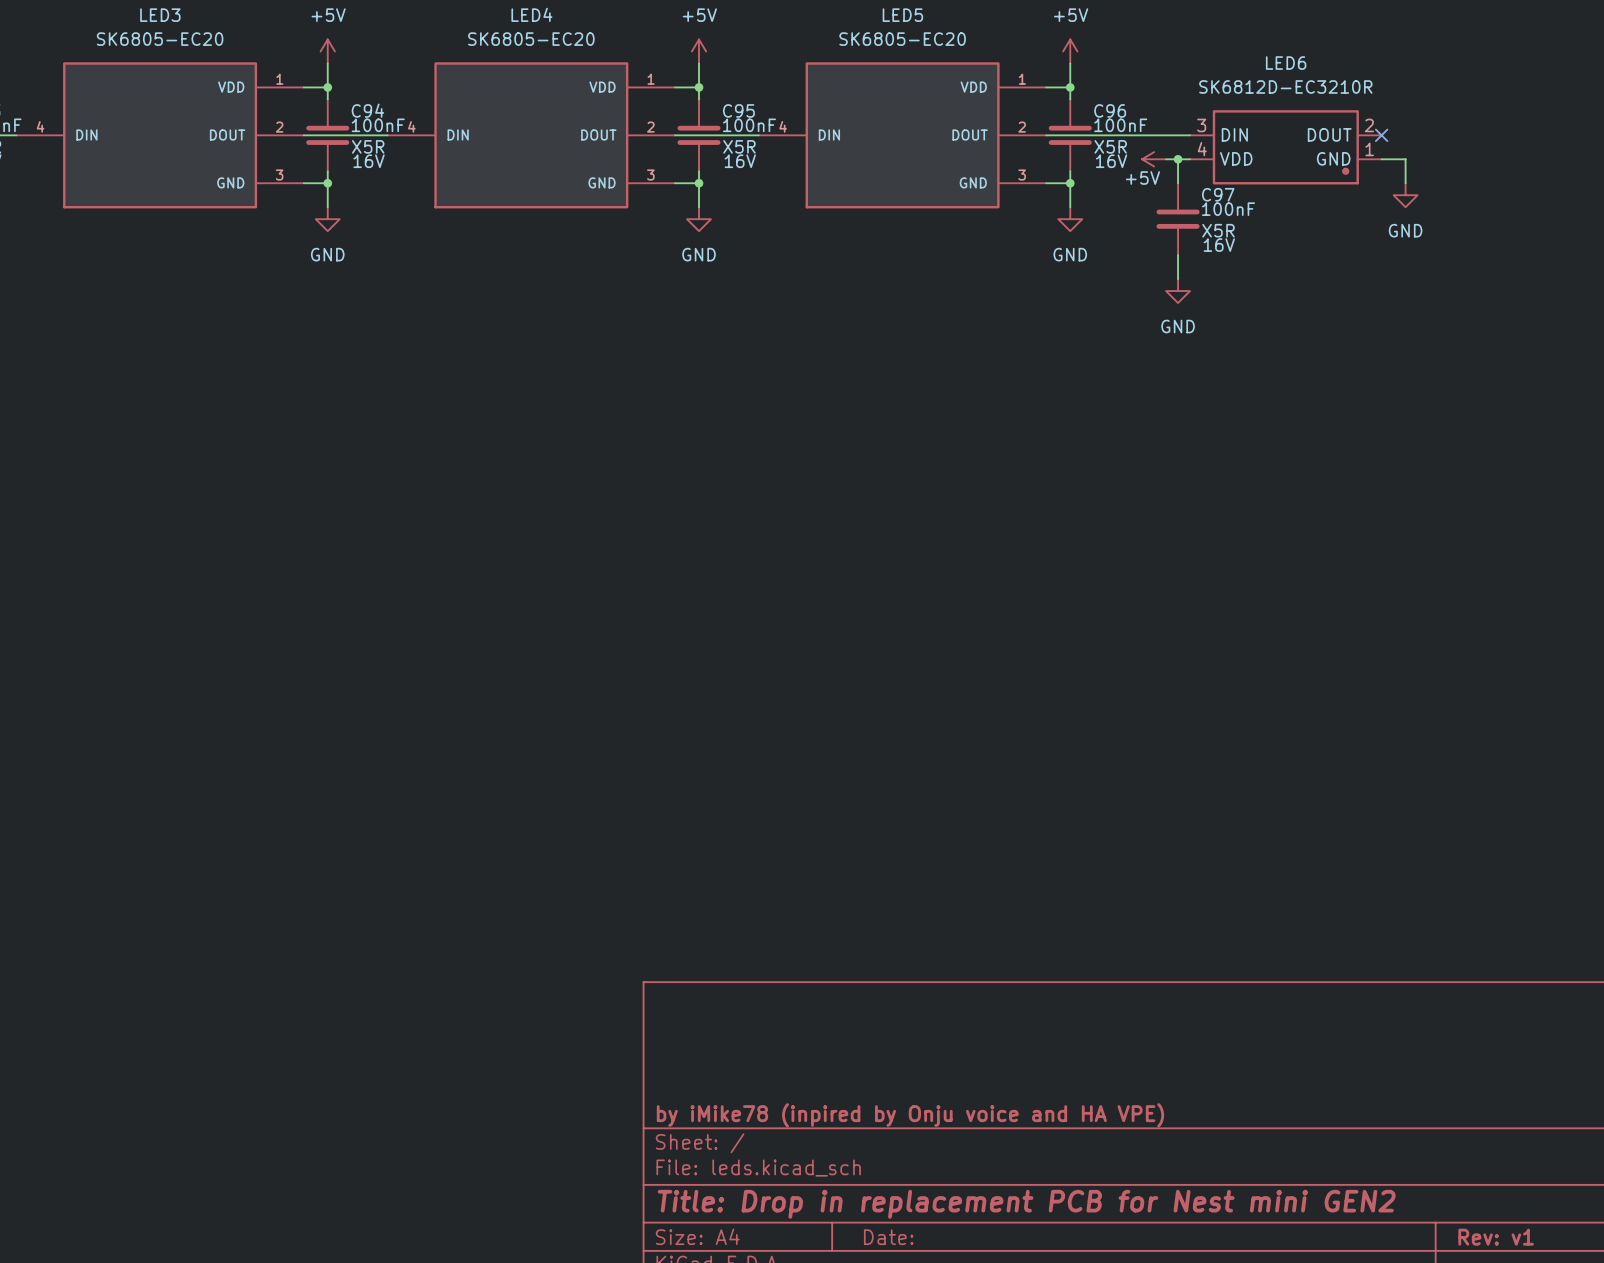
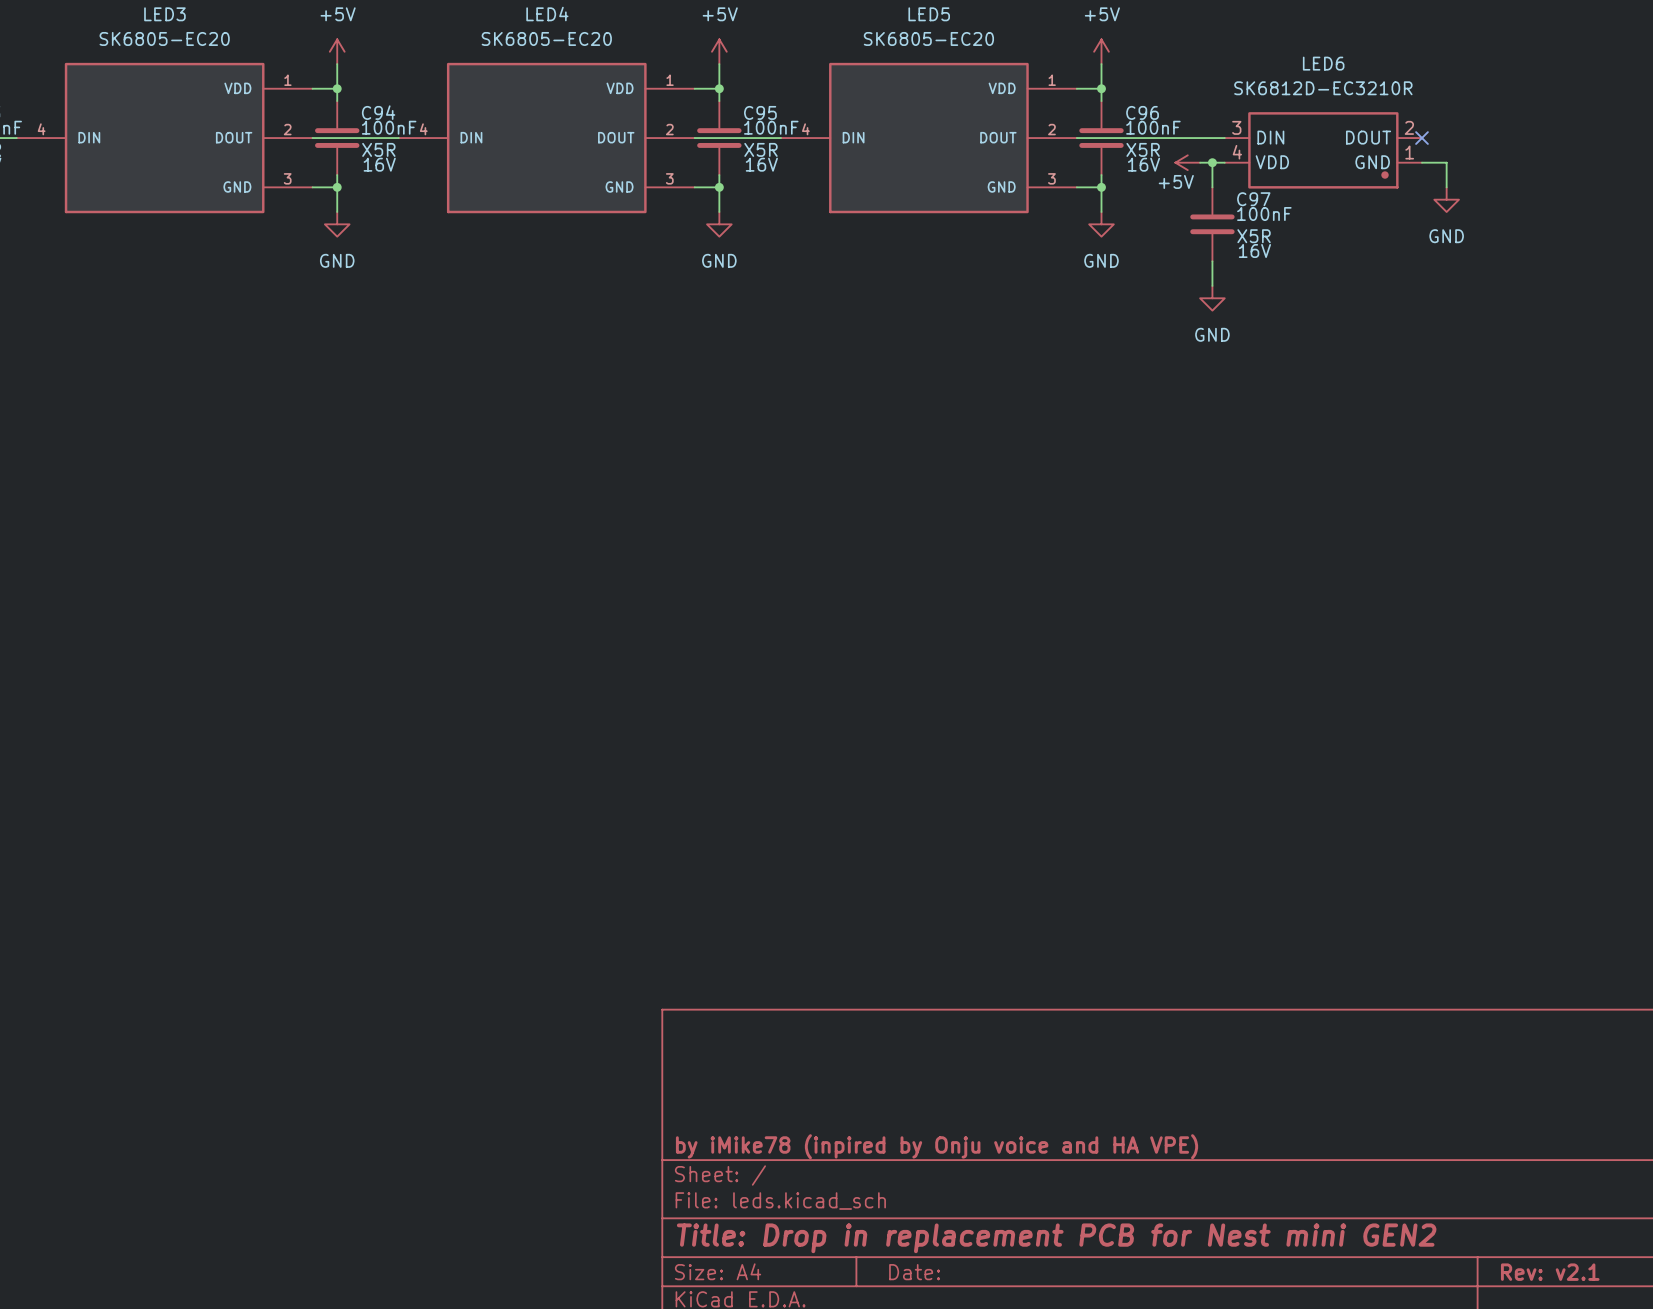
title block: Rev: v1 (1496, 1237) -> Rev: v2.1 (1550, 1272)

